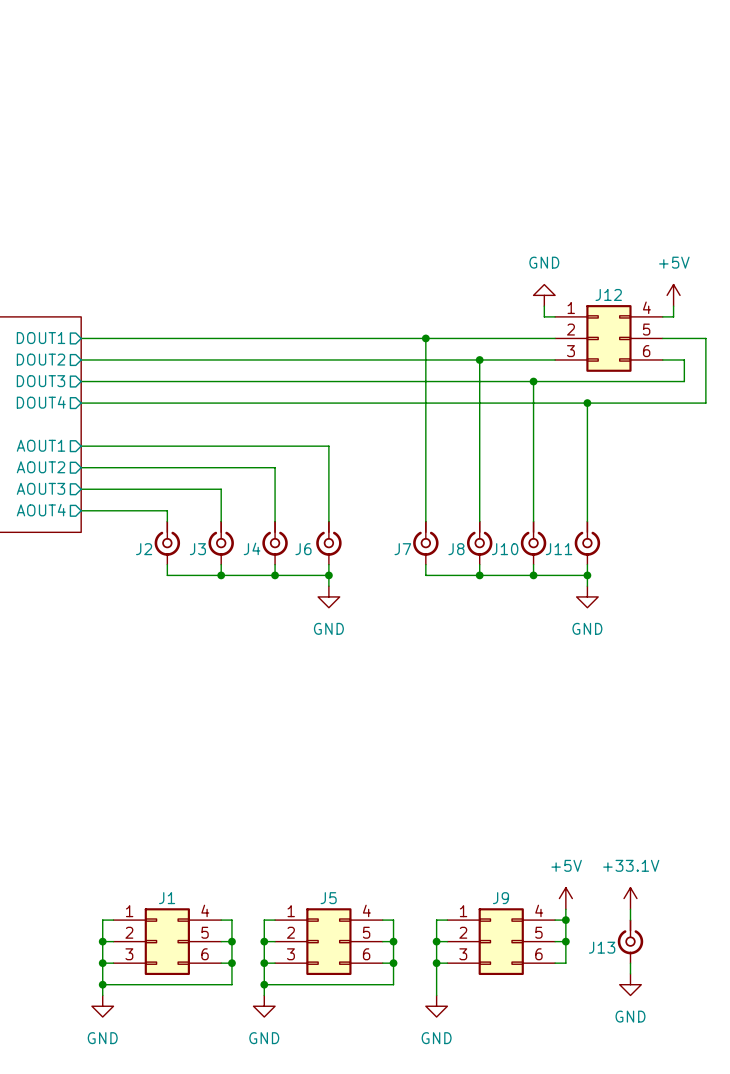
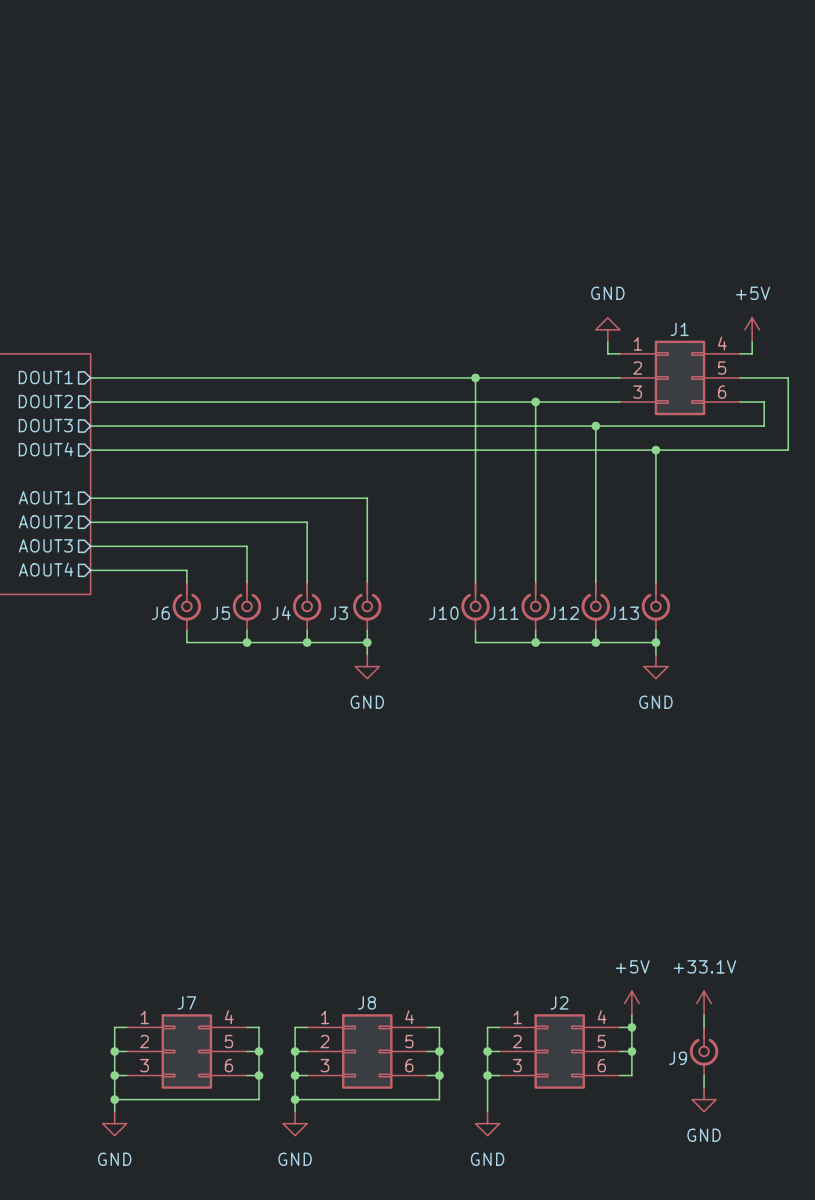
J12 name: J12 (608, 294) -> J1 (679, 329)
J2 name: J2 (144, 549) -> J6 (160, 613)
J3 name: J3 (197, 549) -> J5 (221, 613)
J6 name: J6 (303, 549) -> J3 (338, 613)
J7 name: J7 (402, 549) -> J10 (443, 613)
J8 name: J8 (456, 549) -> J11 (503, 613)
J10 name: J10 (505, 549) -> J12 (564, 613)
J11 name: J11 (559, 549) -> J13 (624, 613)
J1 name: J1 (167, 898) -> J7 (186, 1002)
J5 name: J5 (328, 898) -> J8 (366, 1002)
J9 name: J9 (500, 898) -> J2 (559, 1002)
J13 name: J13 (602, 947) -> J9 (678, 1058)

